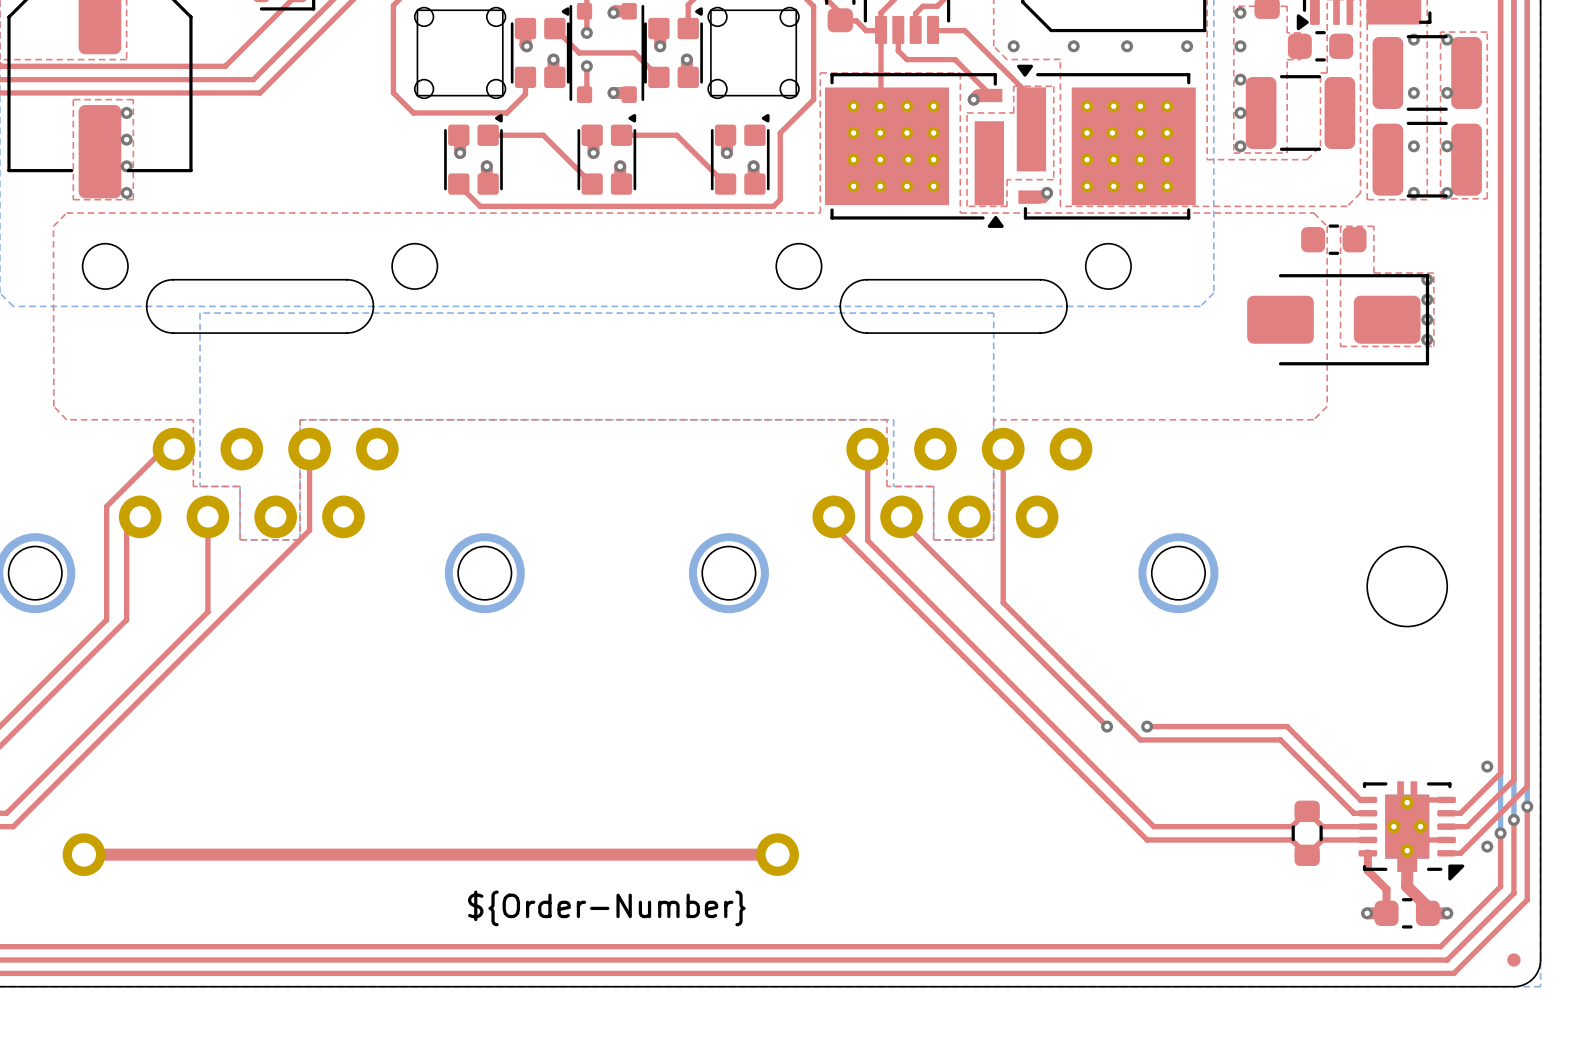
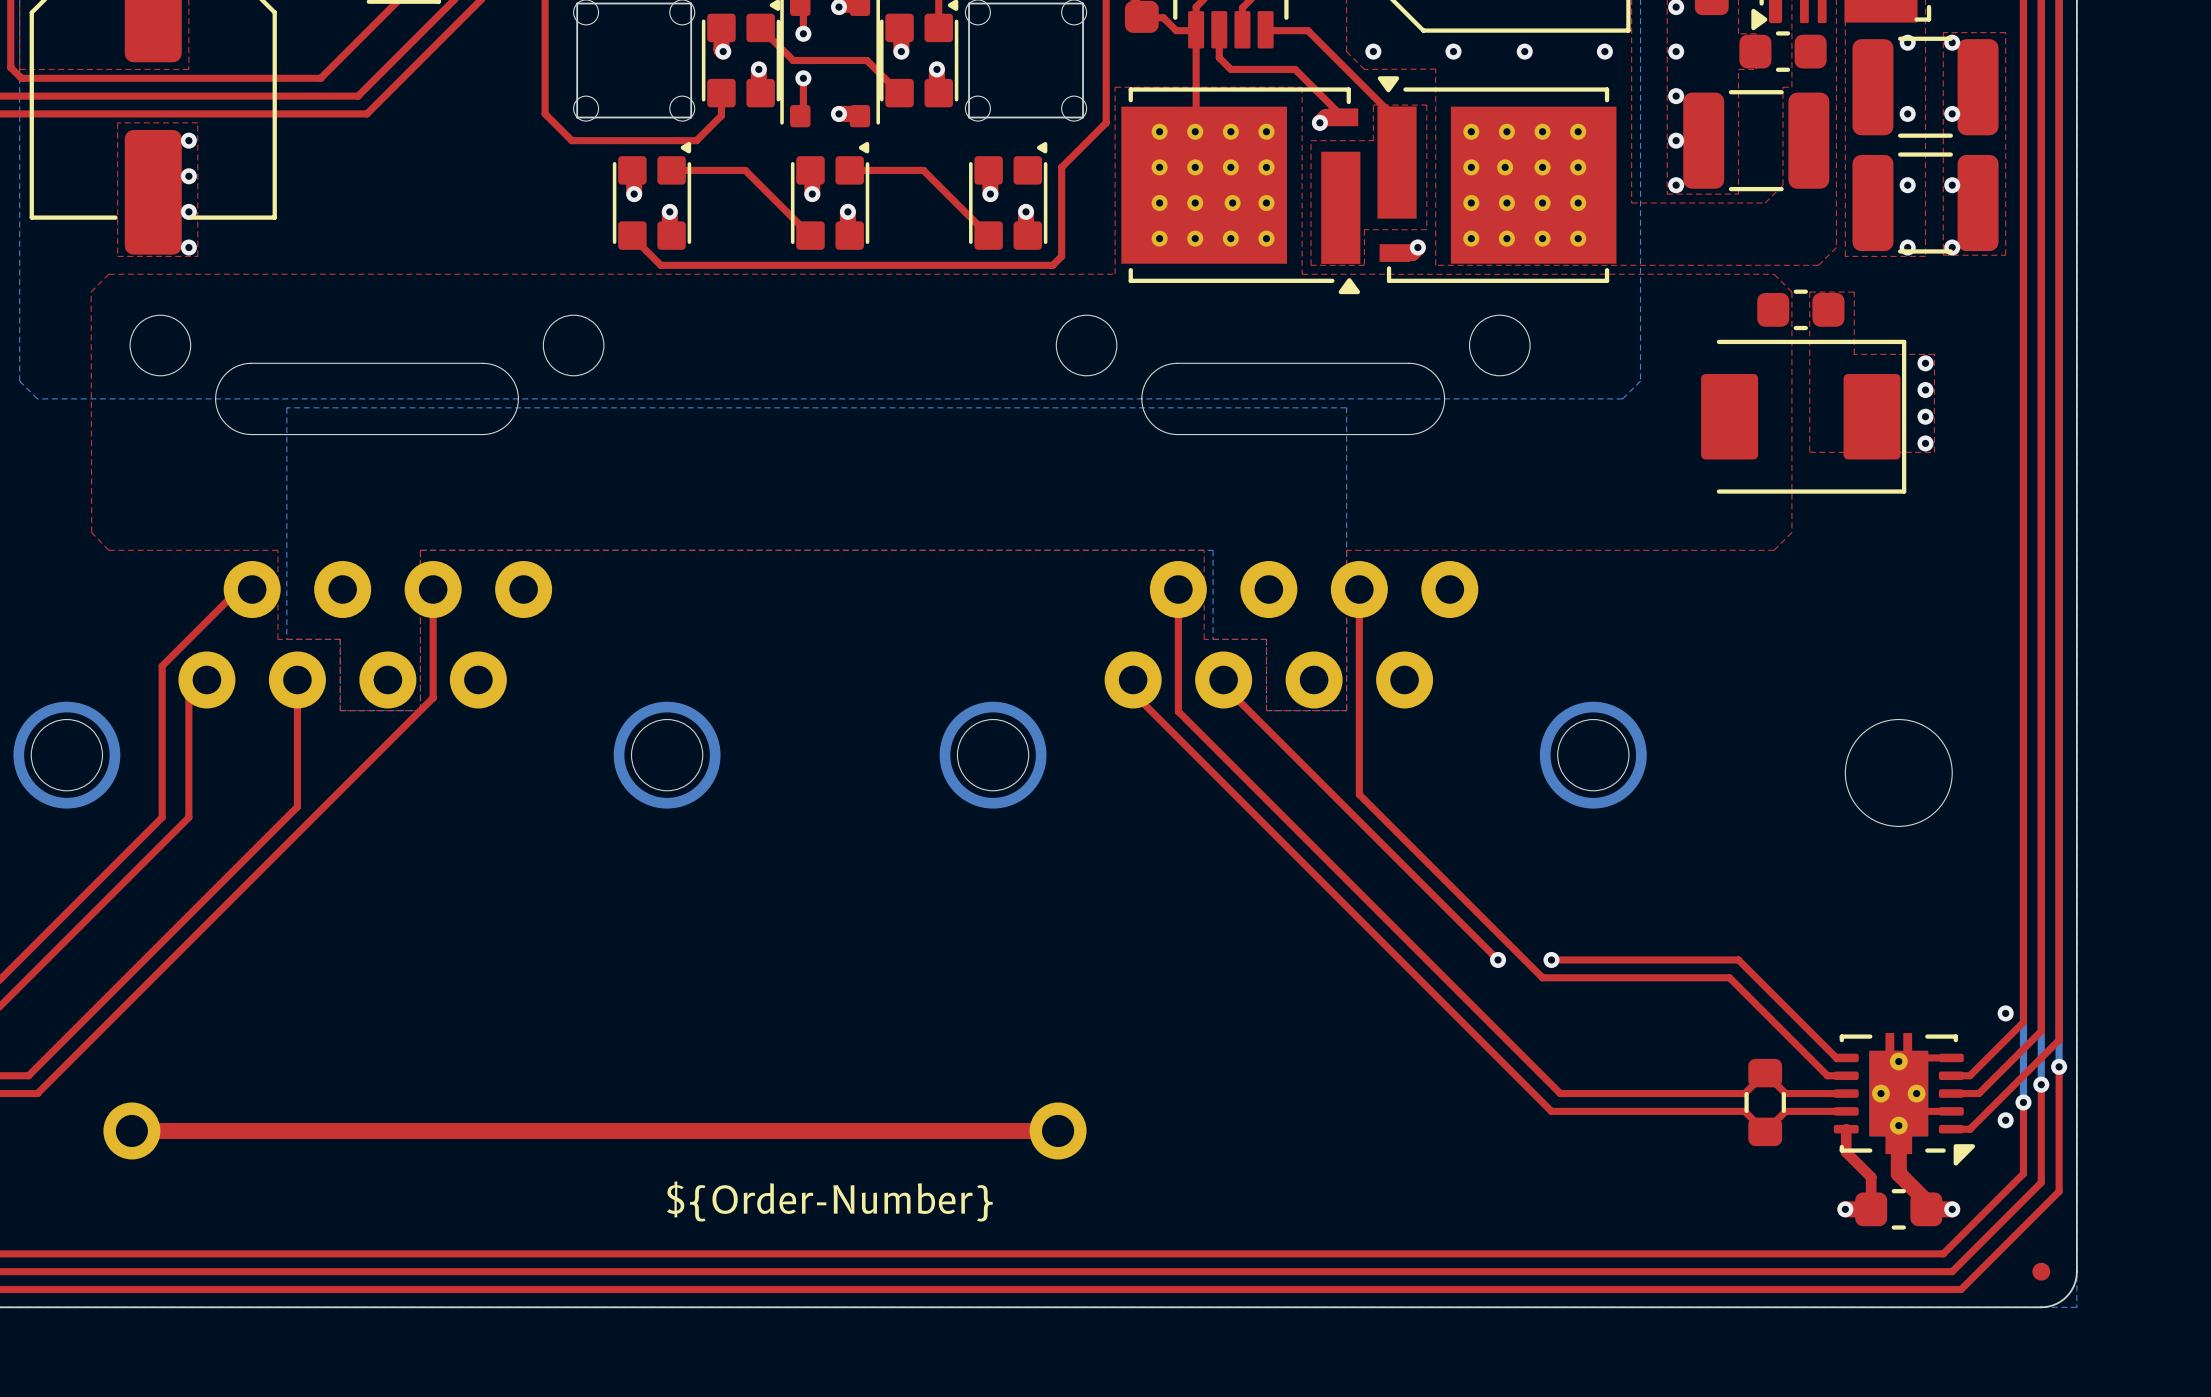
part footprint: [1247, 274, 1430, 366] -> [1701, 339, 1907, 494]

